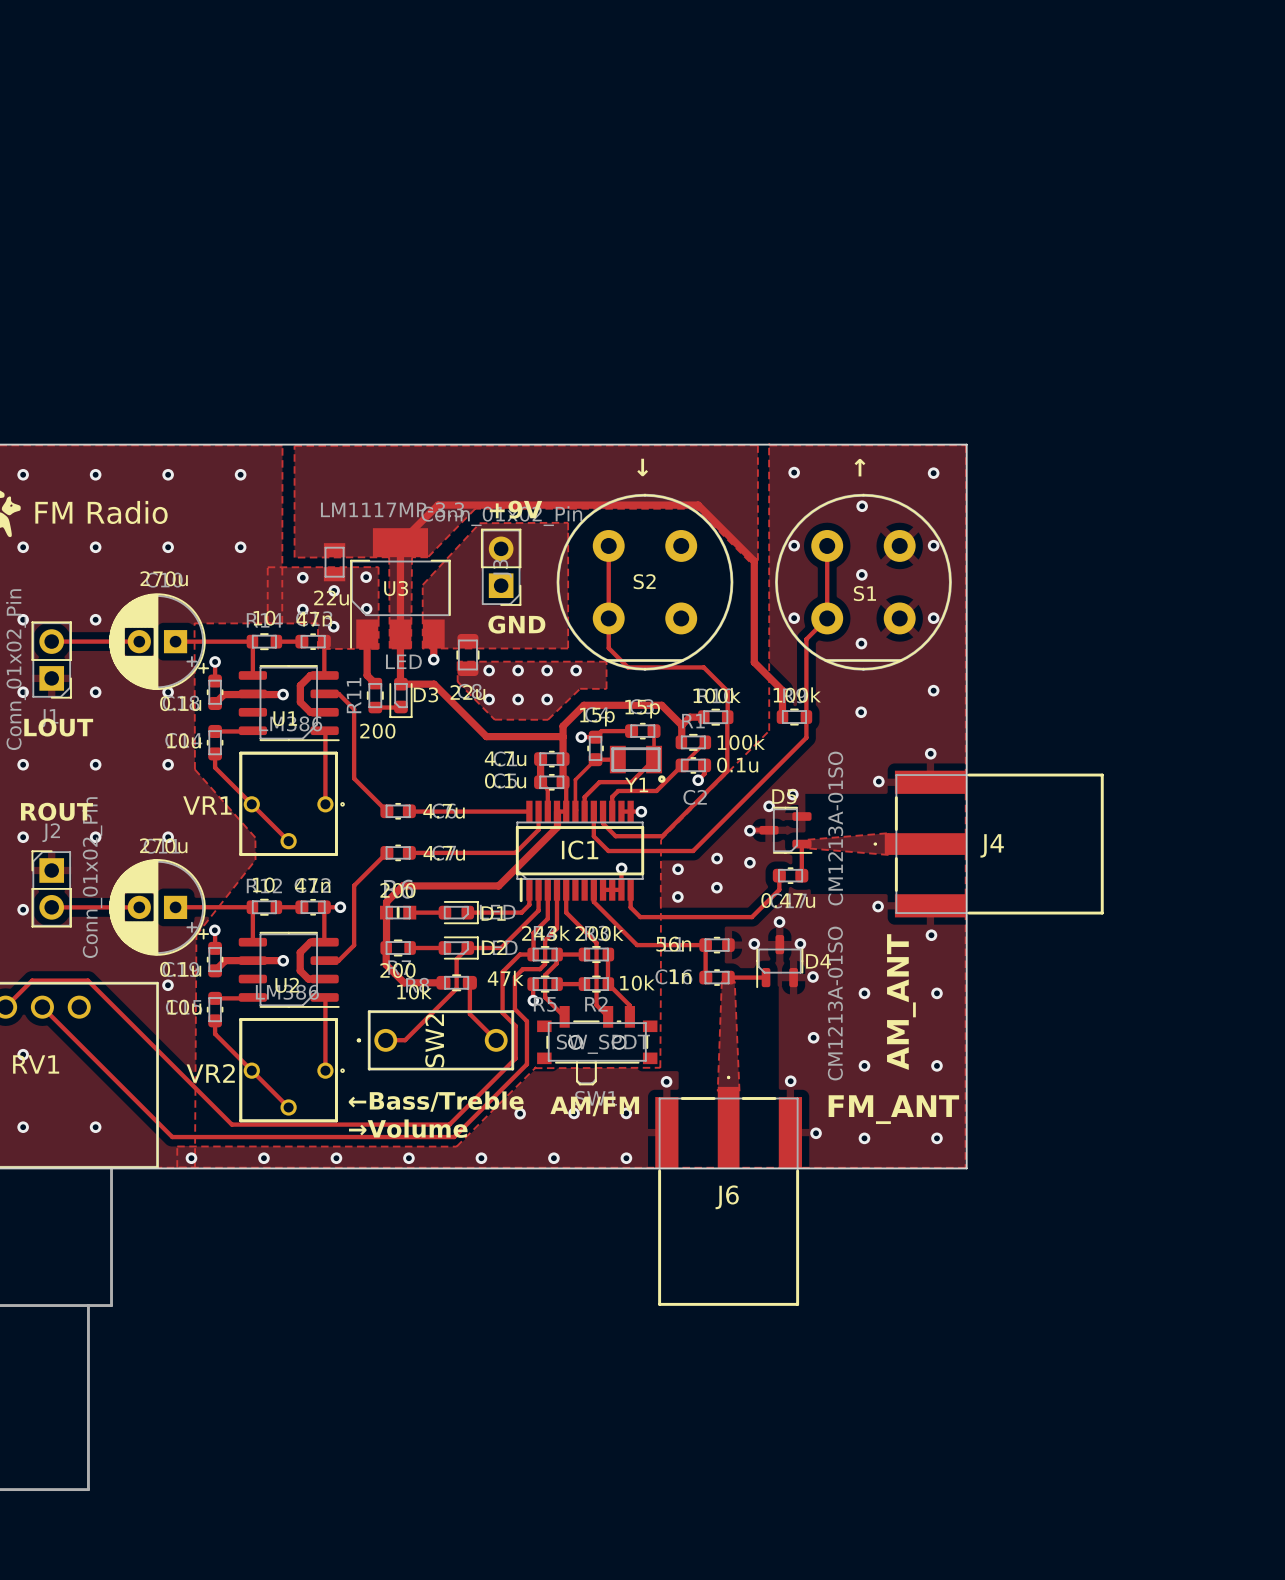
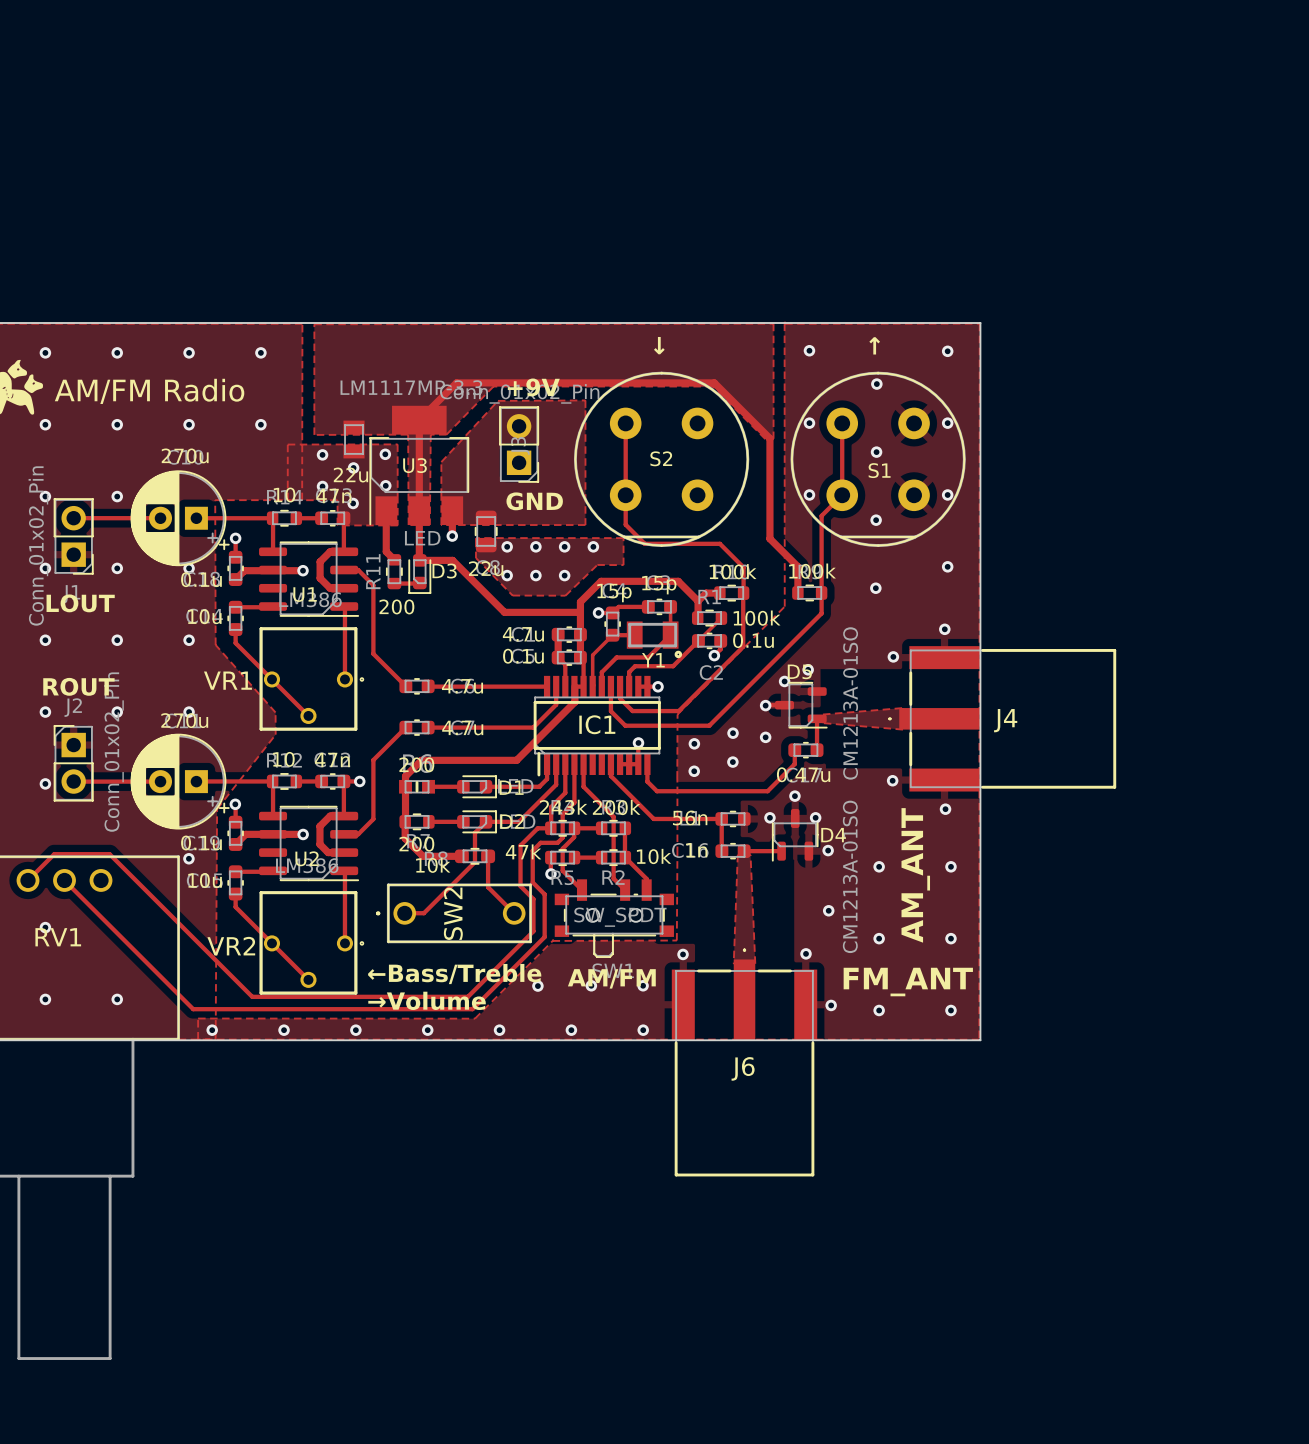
text: FM Radio (101, 512) -> AM/FM Radio (149, 391)

